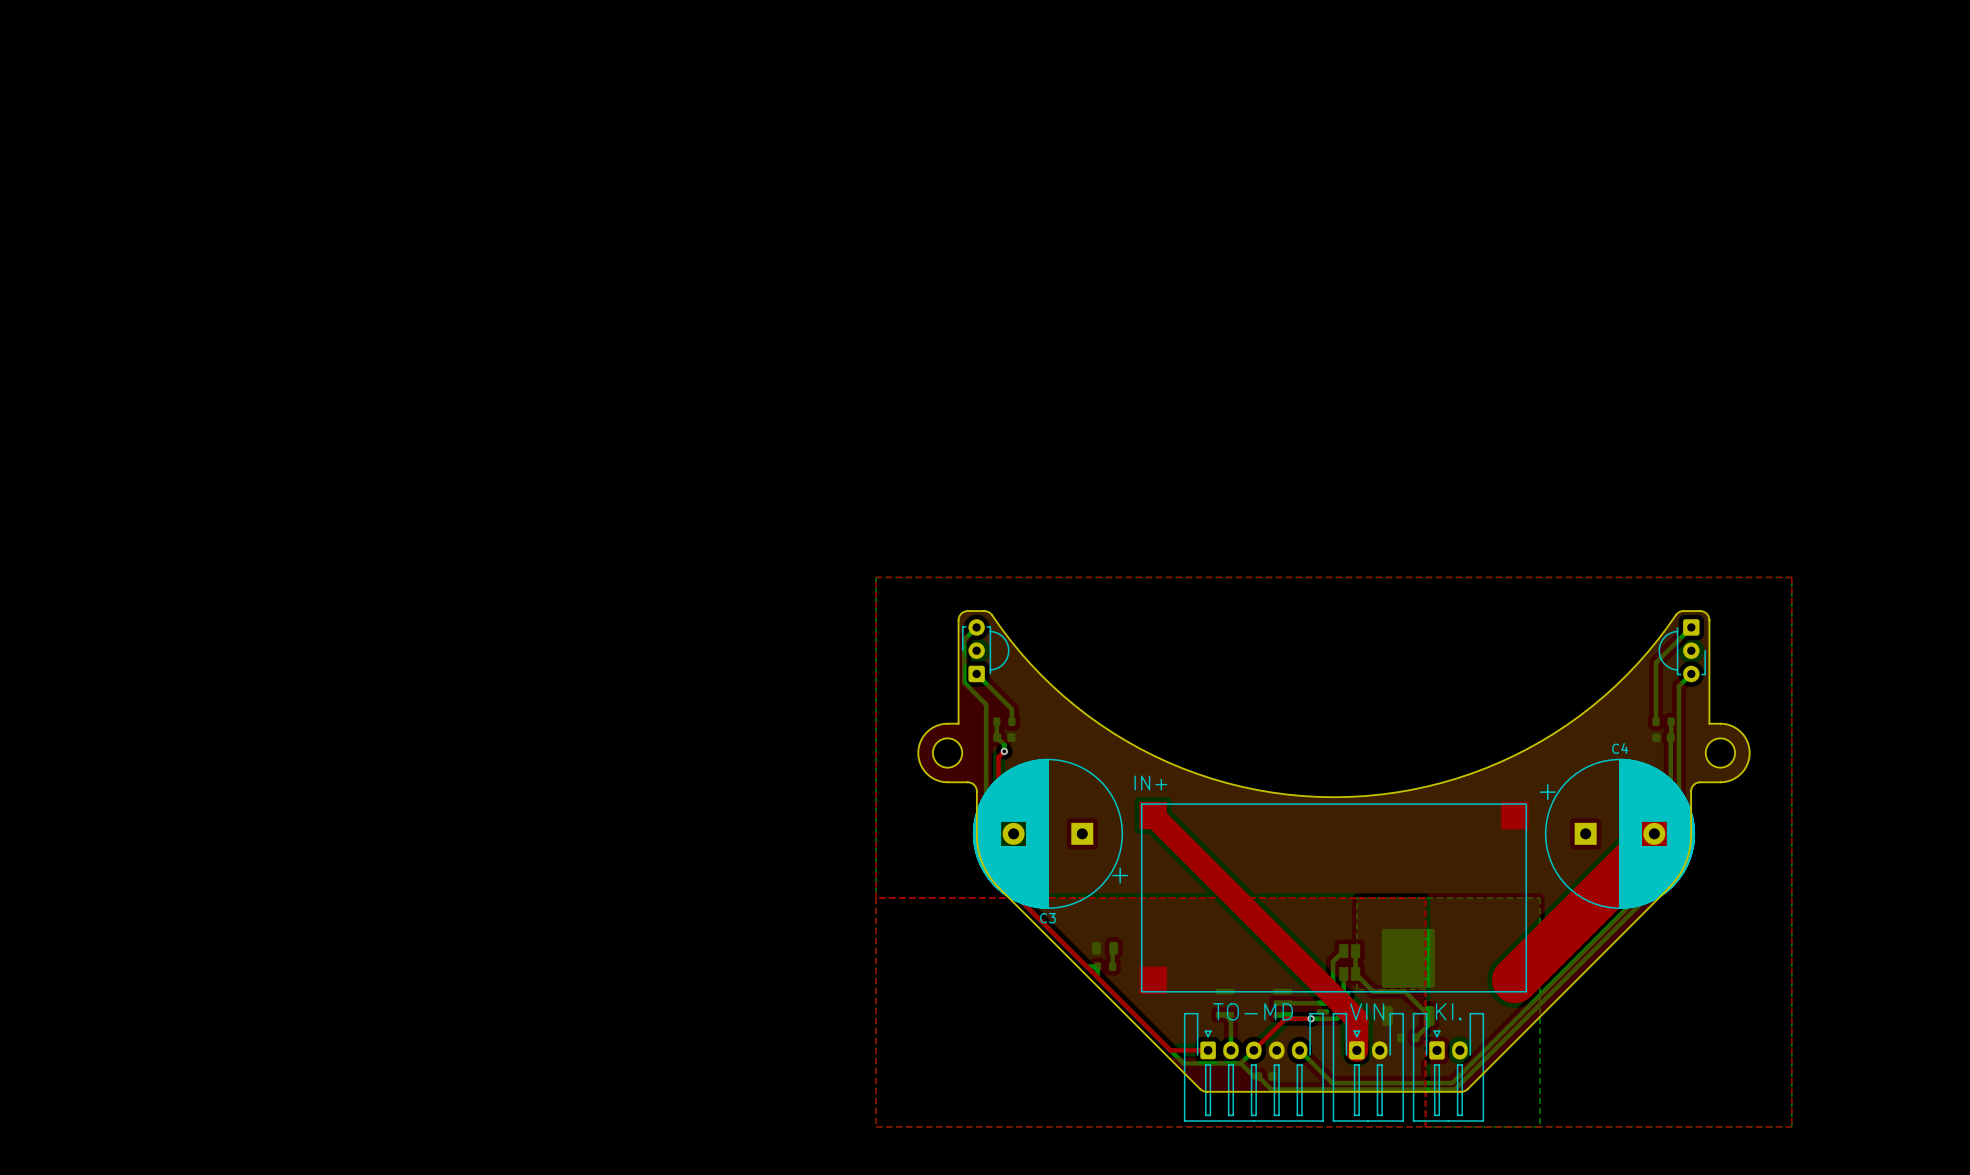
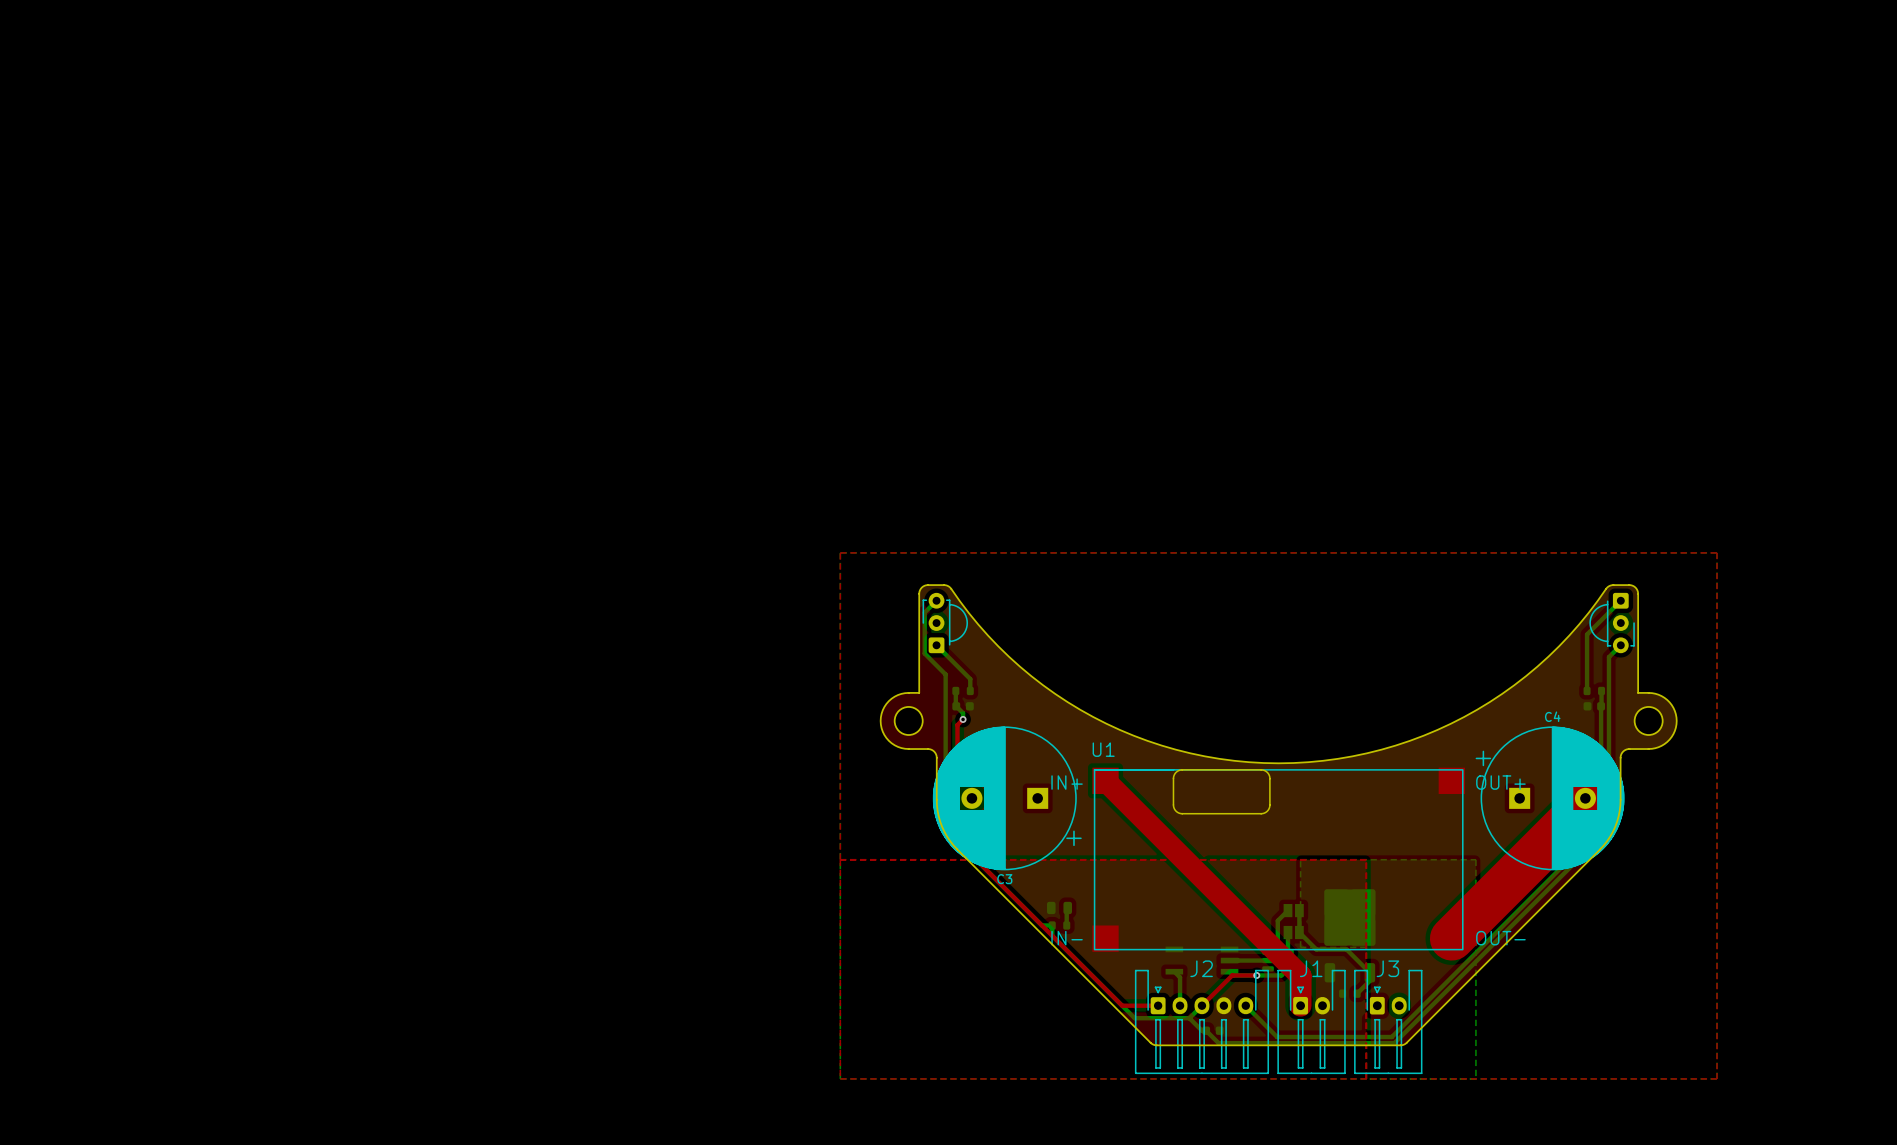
IN+: (1333, 897) -> none
U1: none -> (1278, 859)
TO-MD name: TO-MD (1253, 1011) -> J2 (1201, 968)
VIN name: VIN (1367, 1011) -> J1 (1311, 968)
KI. name: KI. (1448, 1011) -> J3 (1387, 968)

